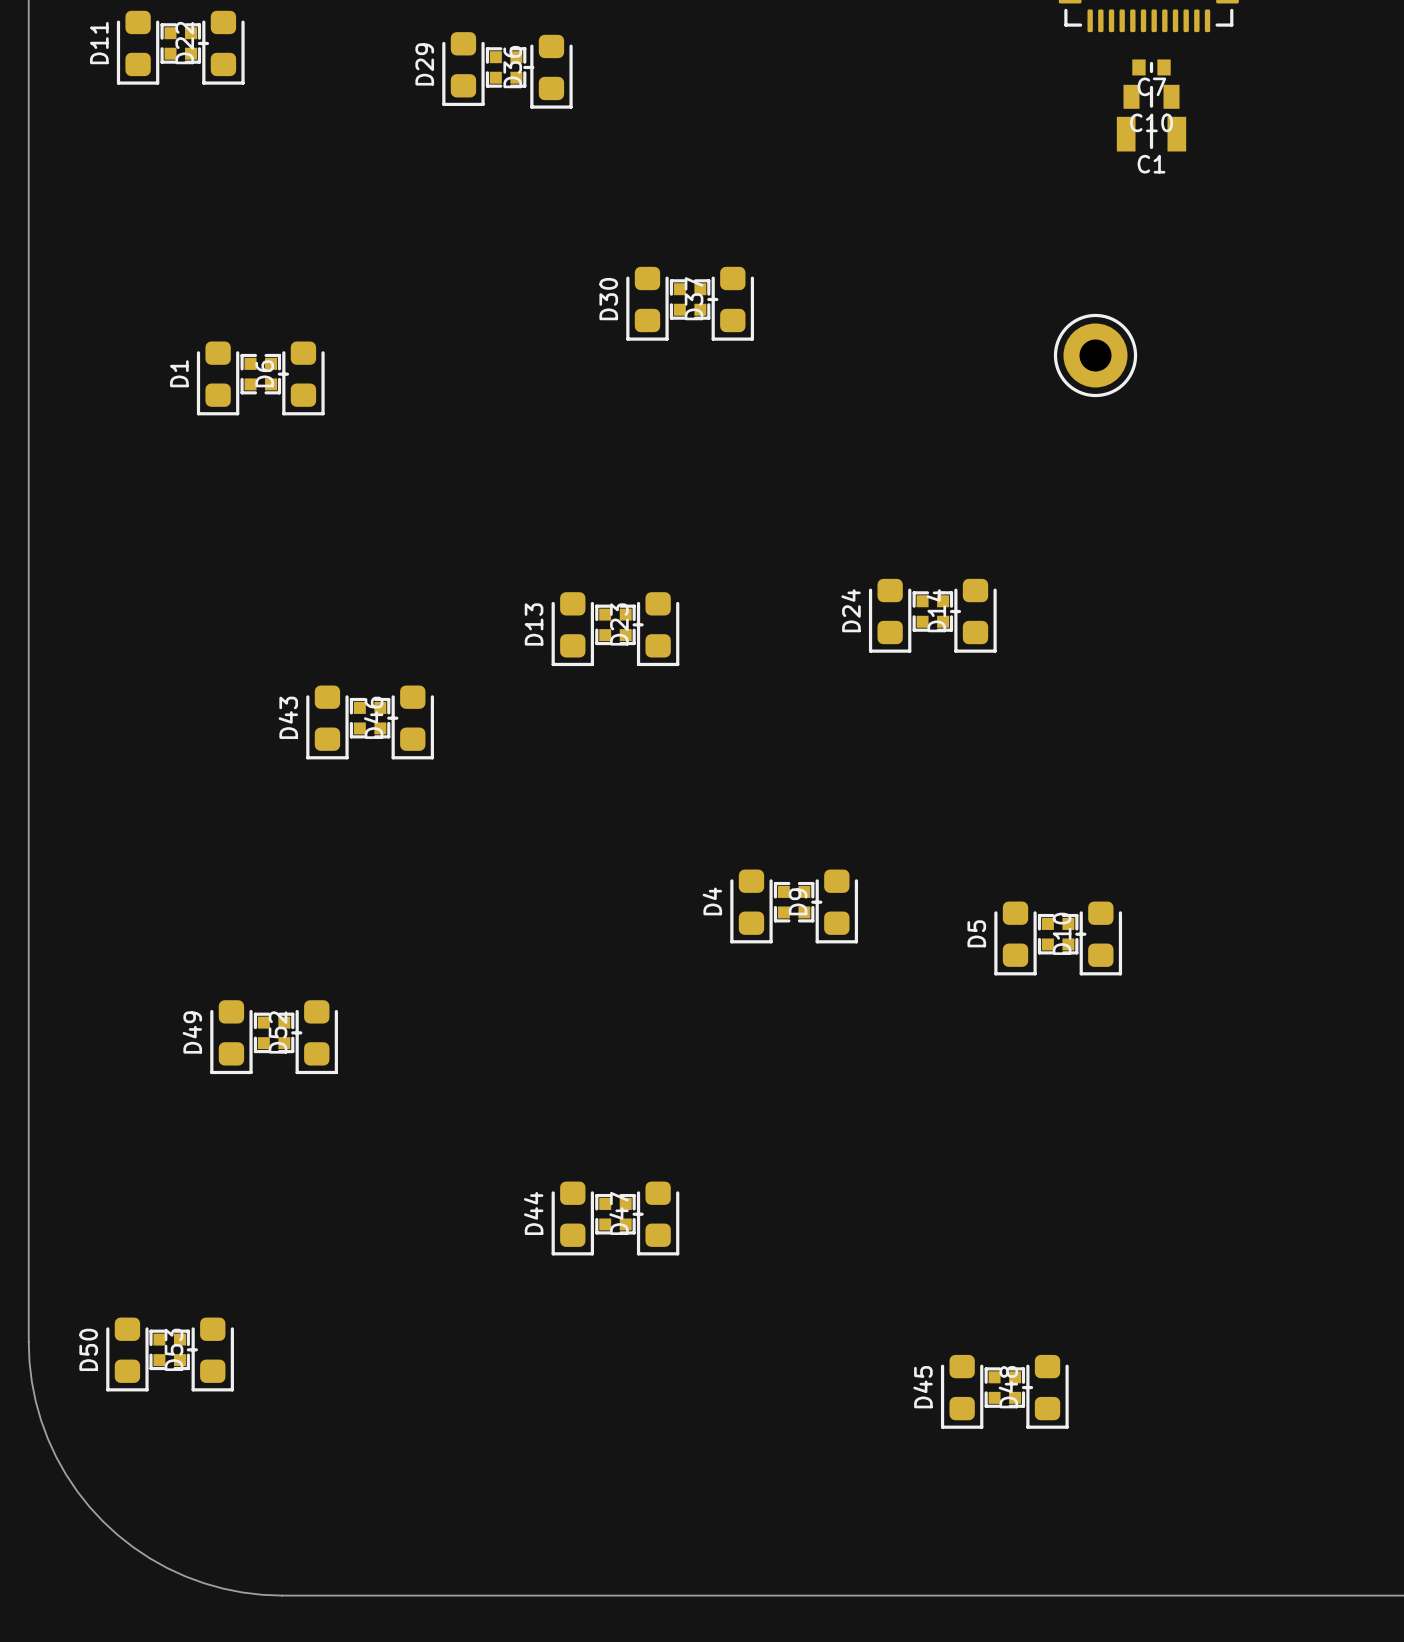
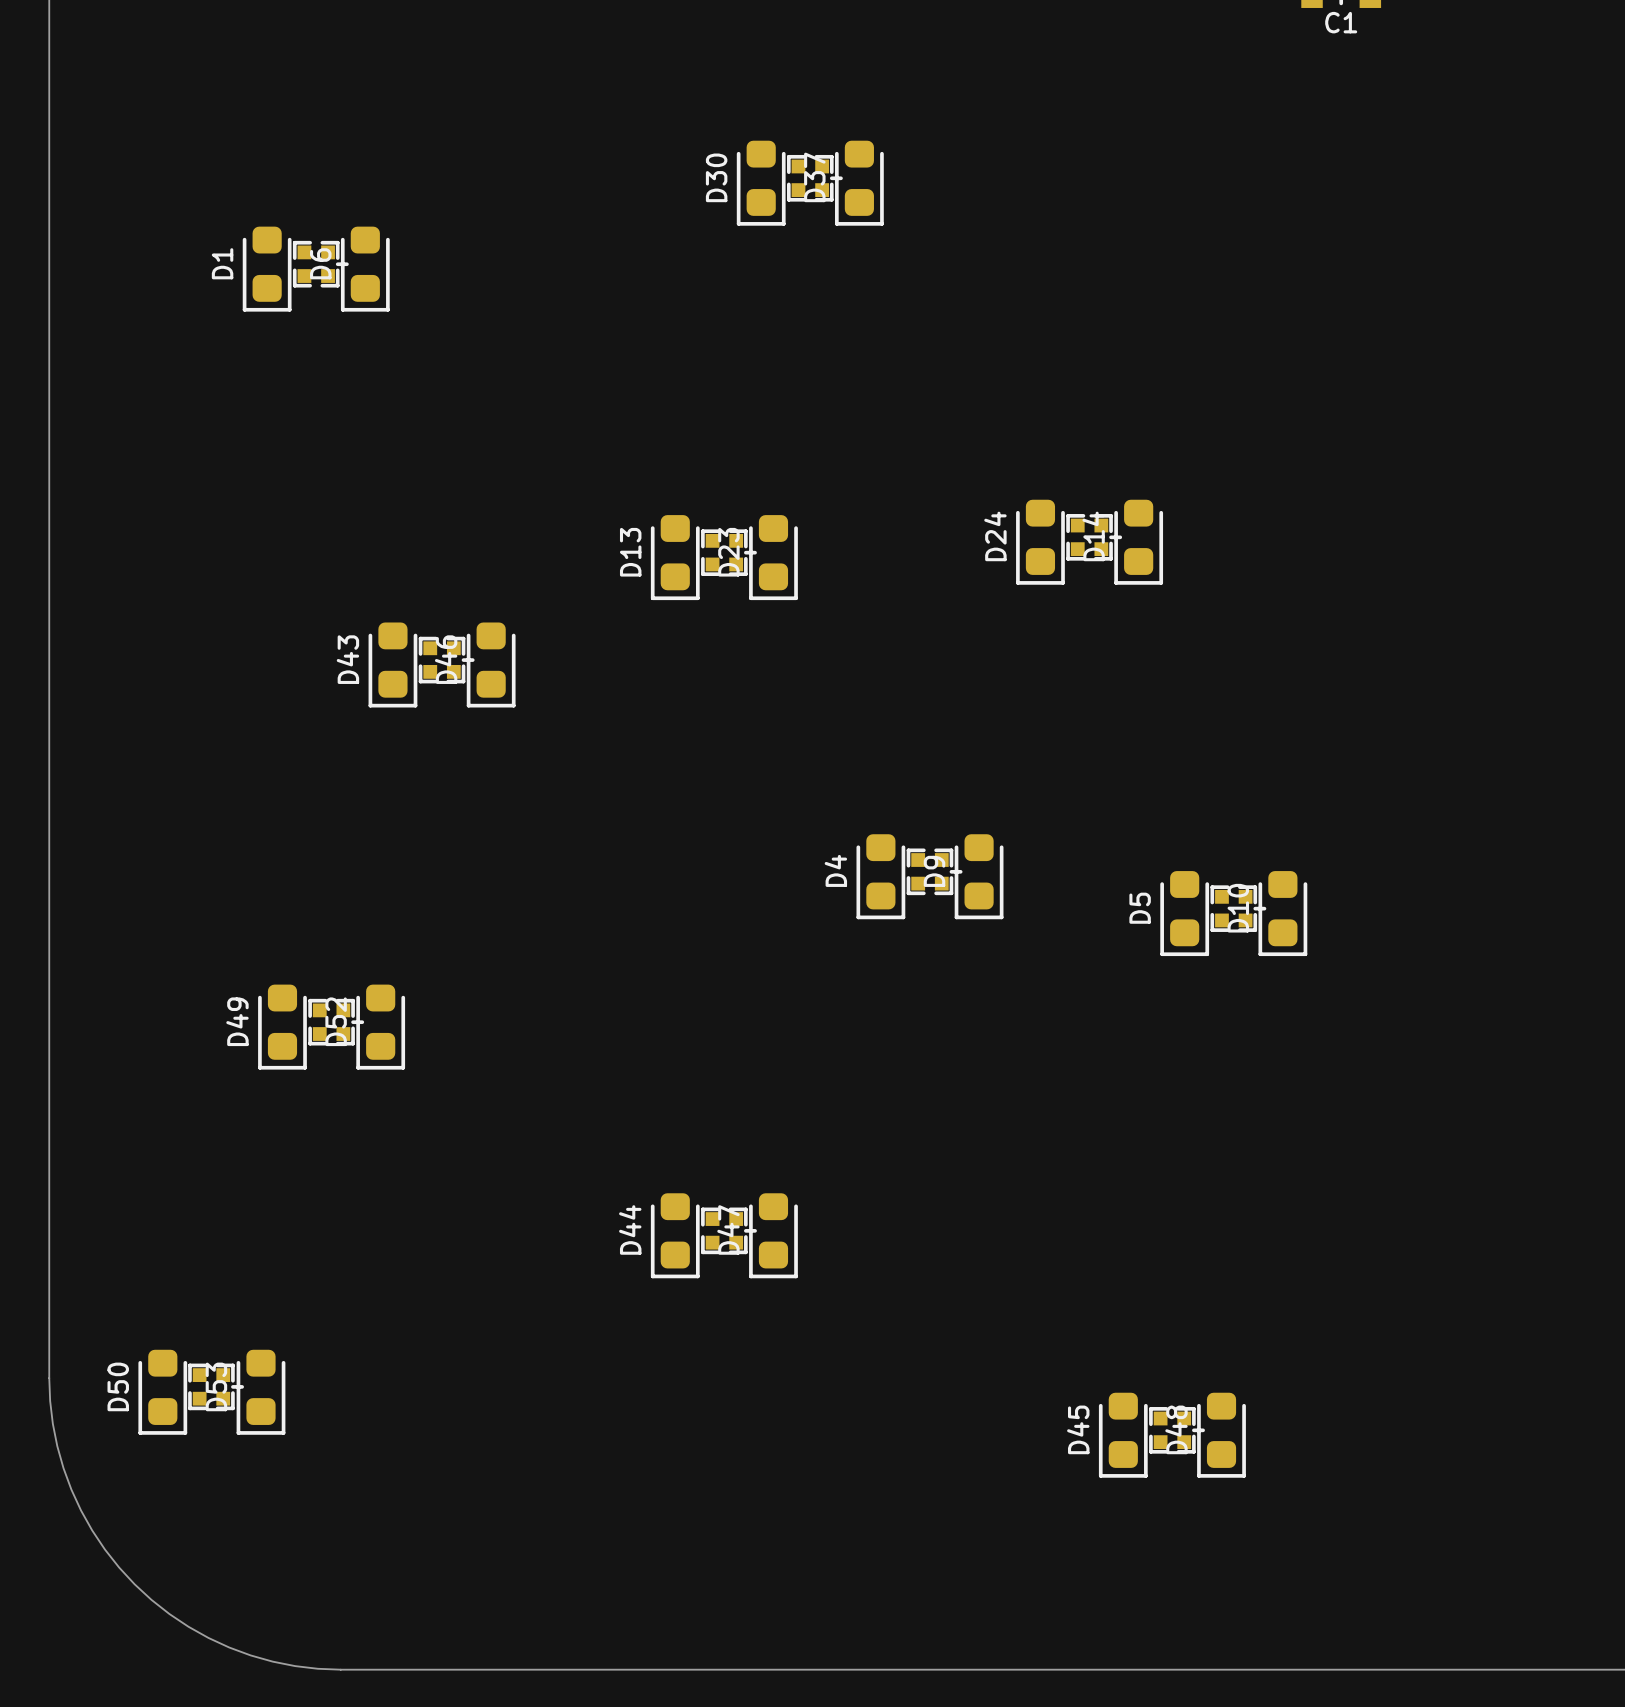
part: (1095, 355) -> none

